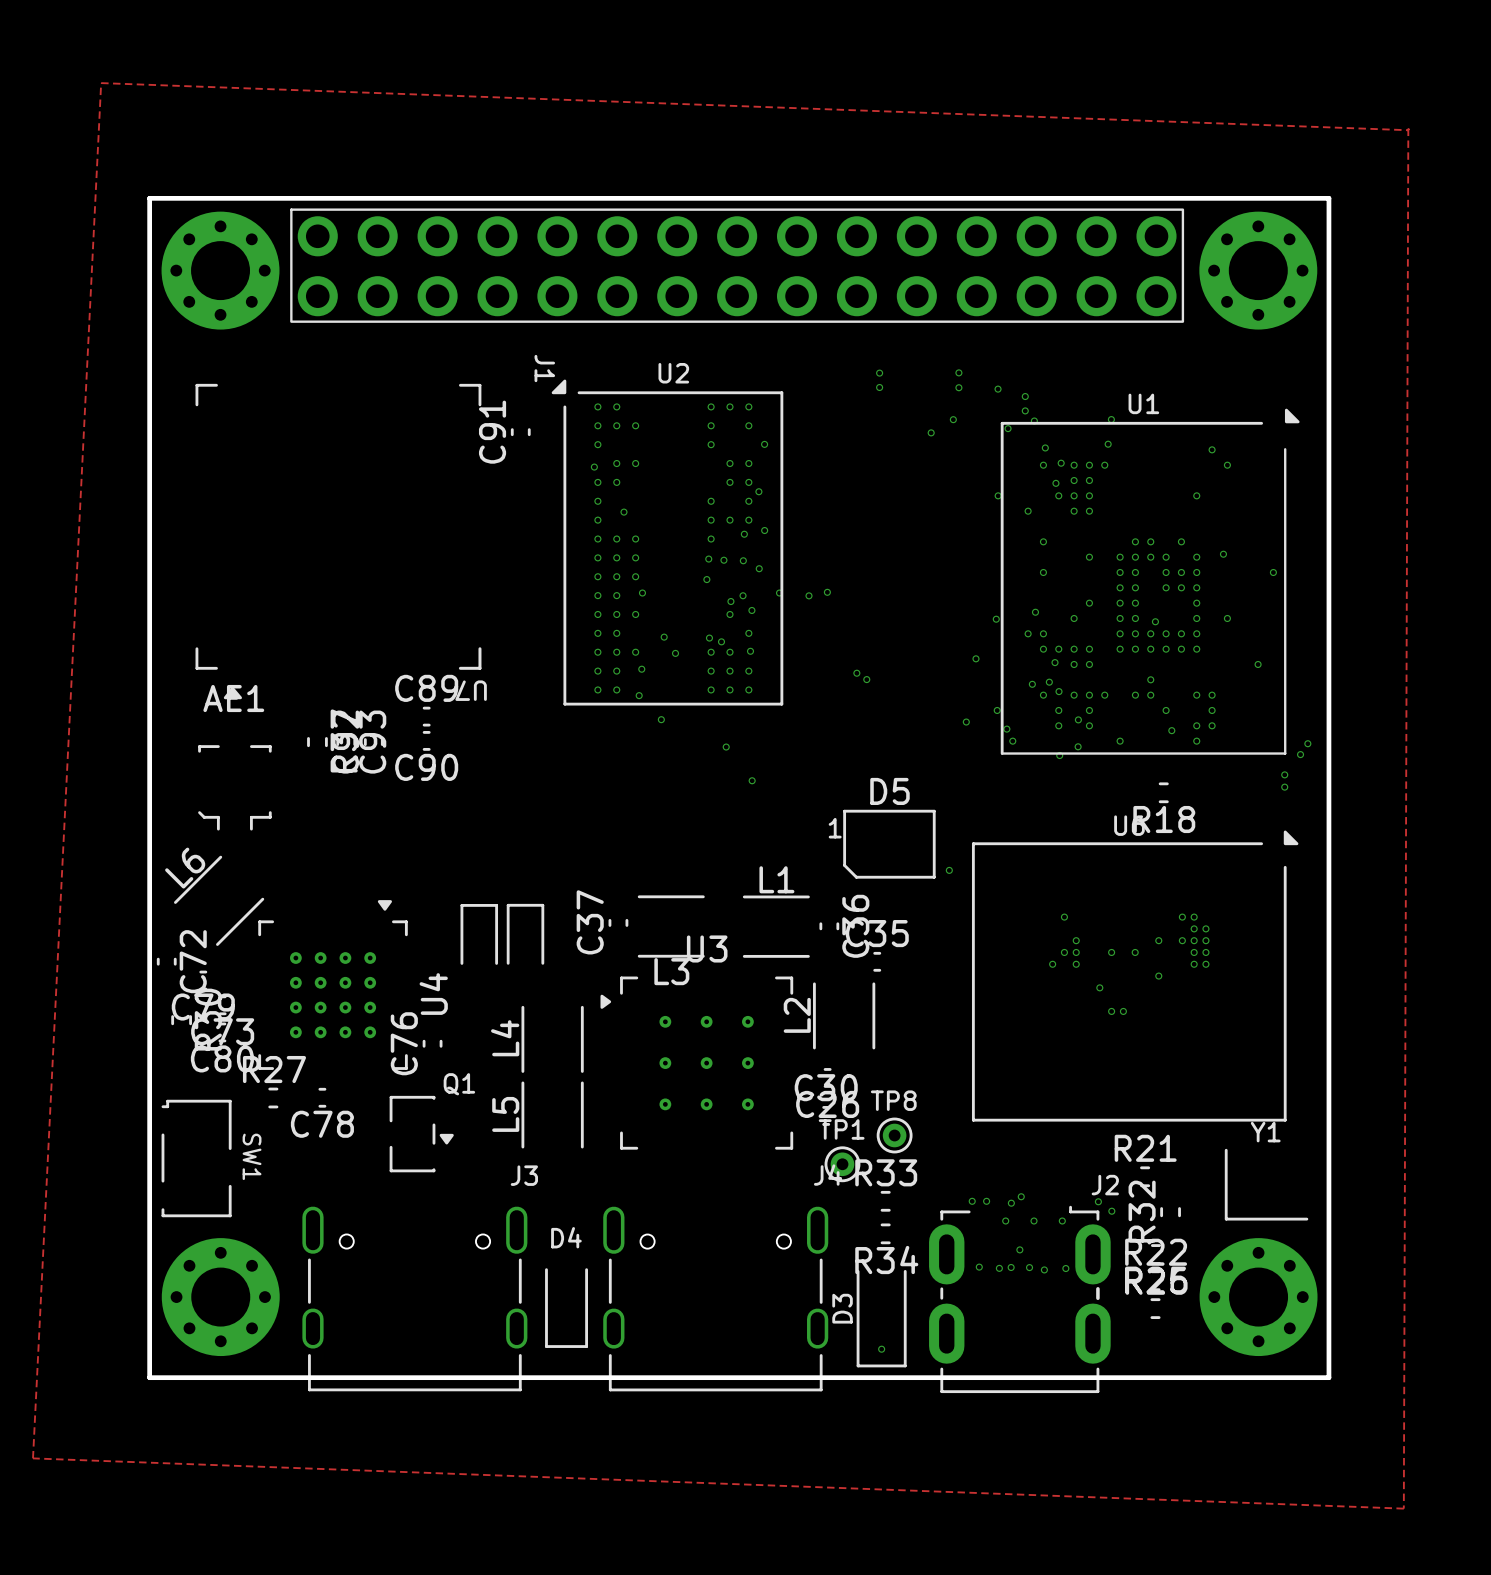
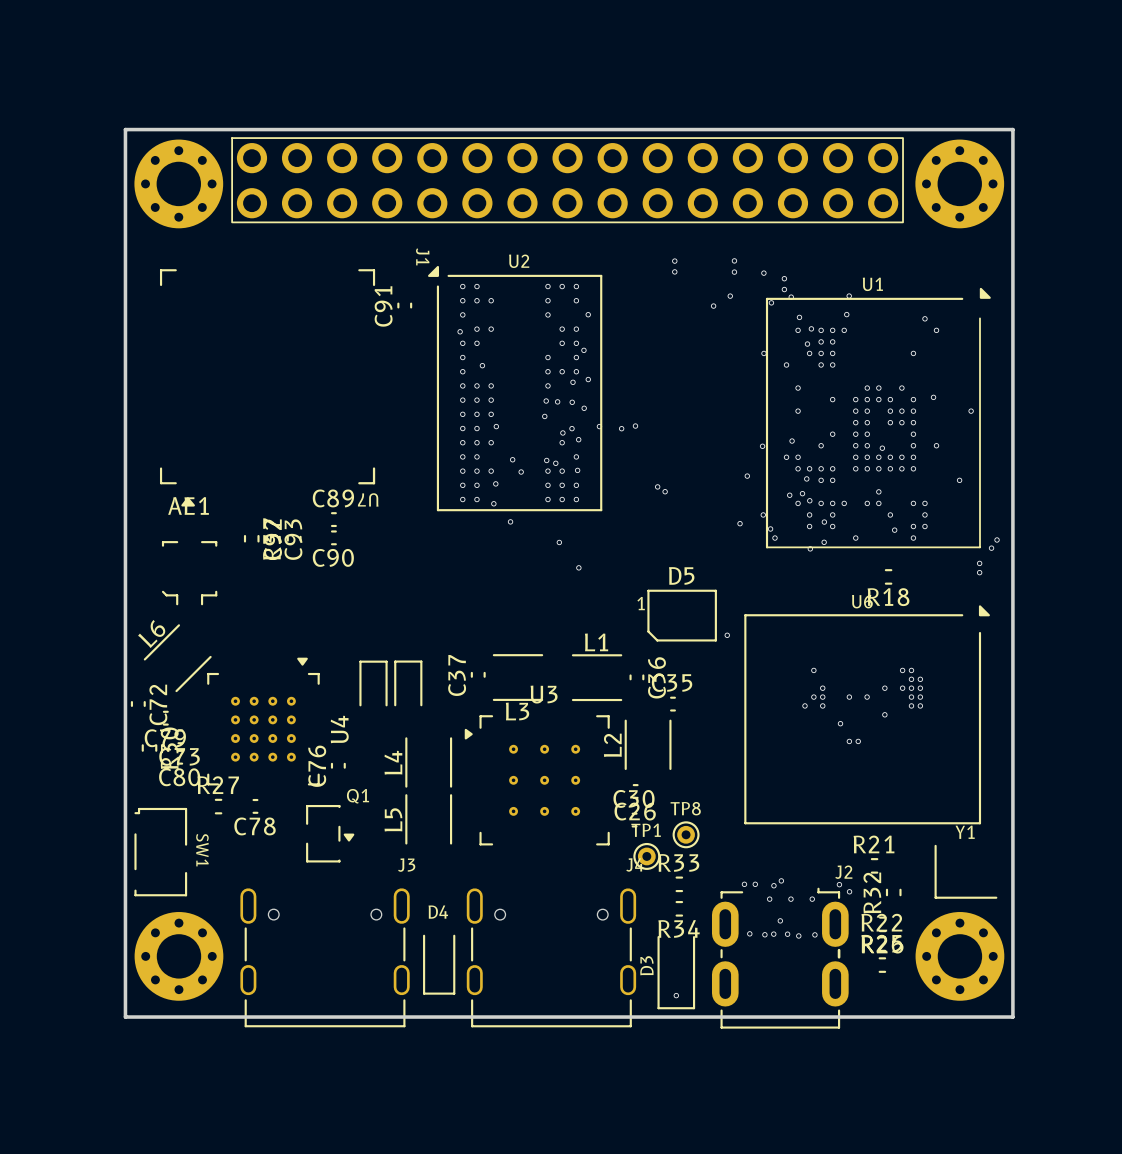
zone outline: (101, 83) (33, 1458) (1403, 1508) (1408, 128) (1409, 130) (101, 83) -> none

